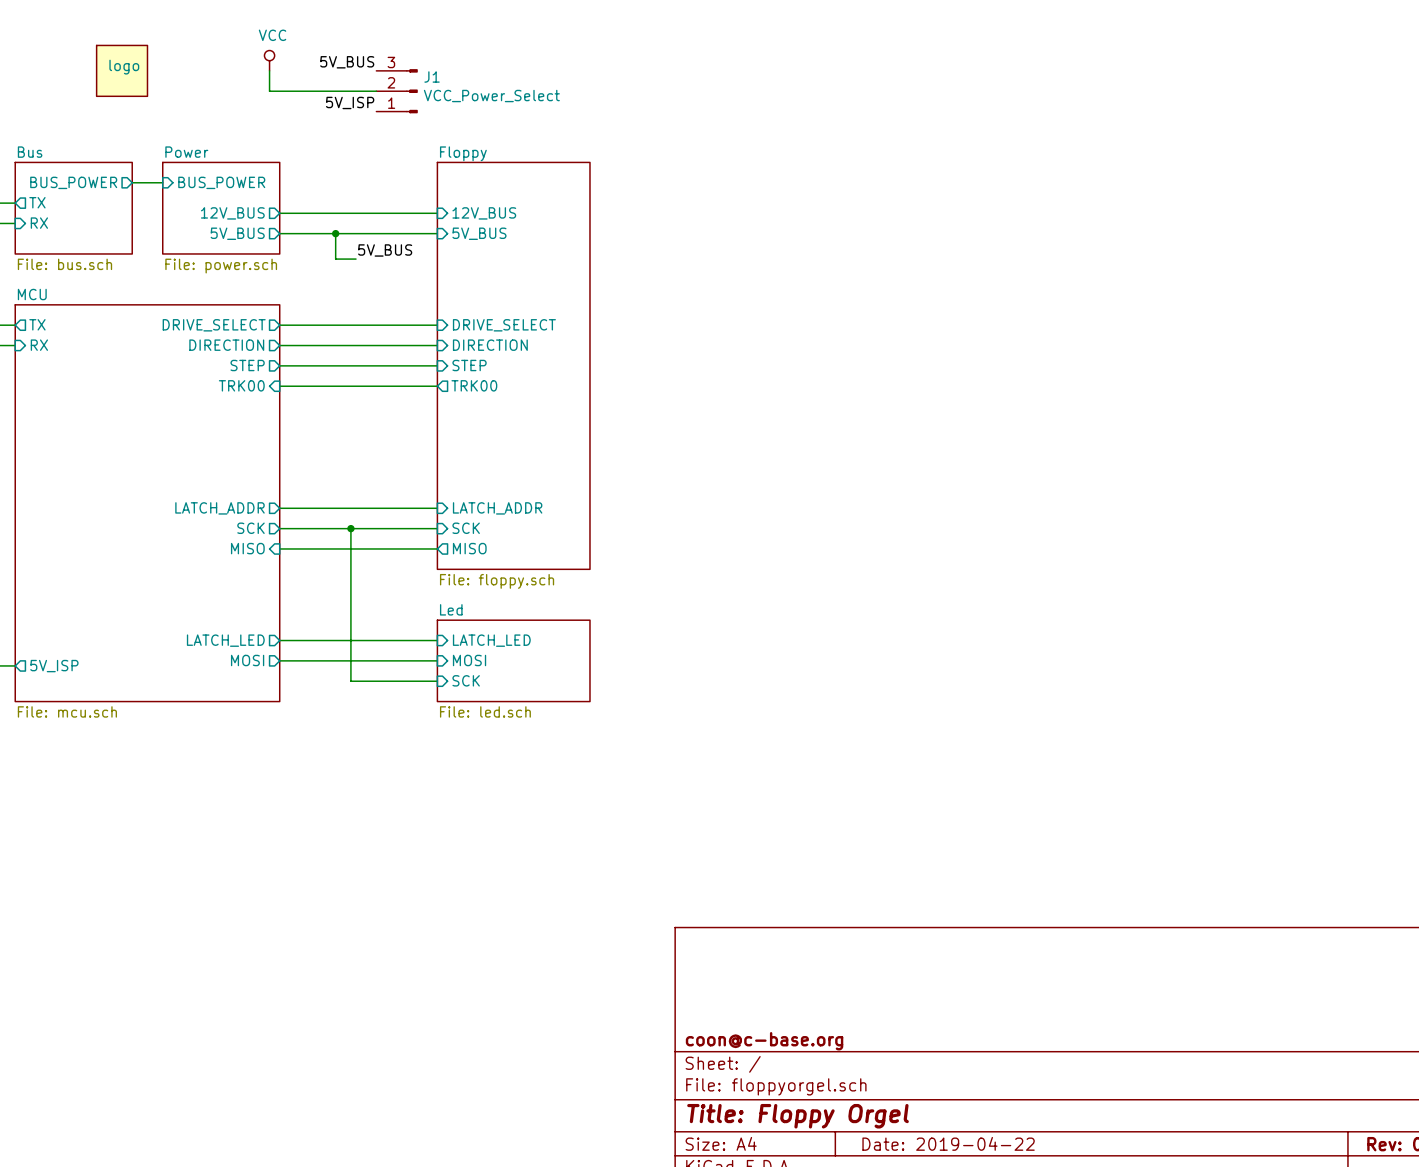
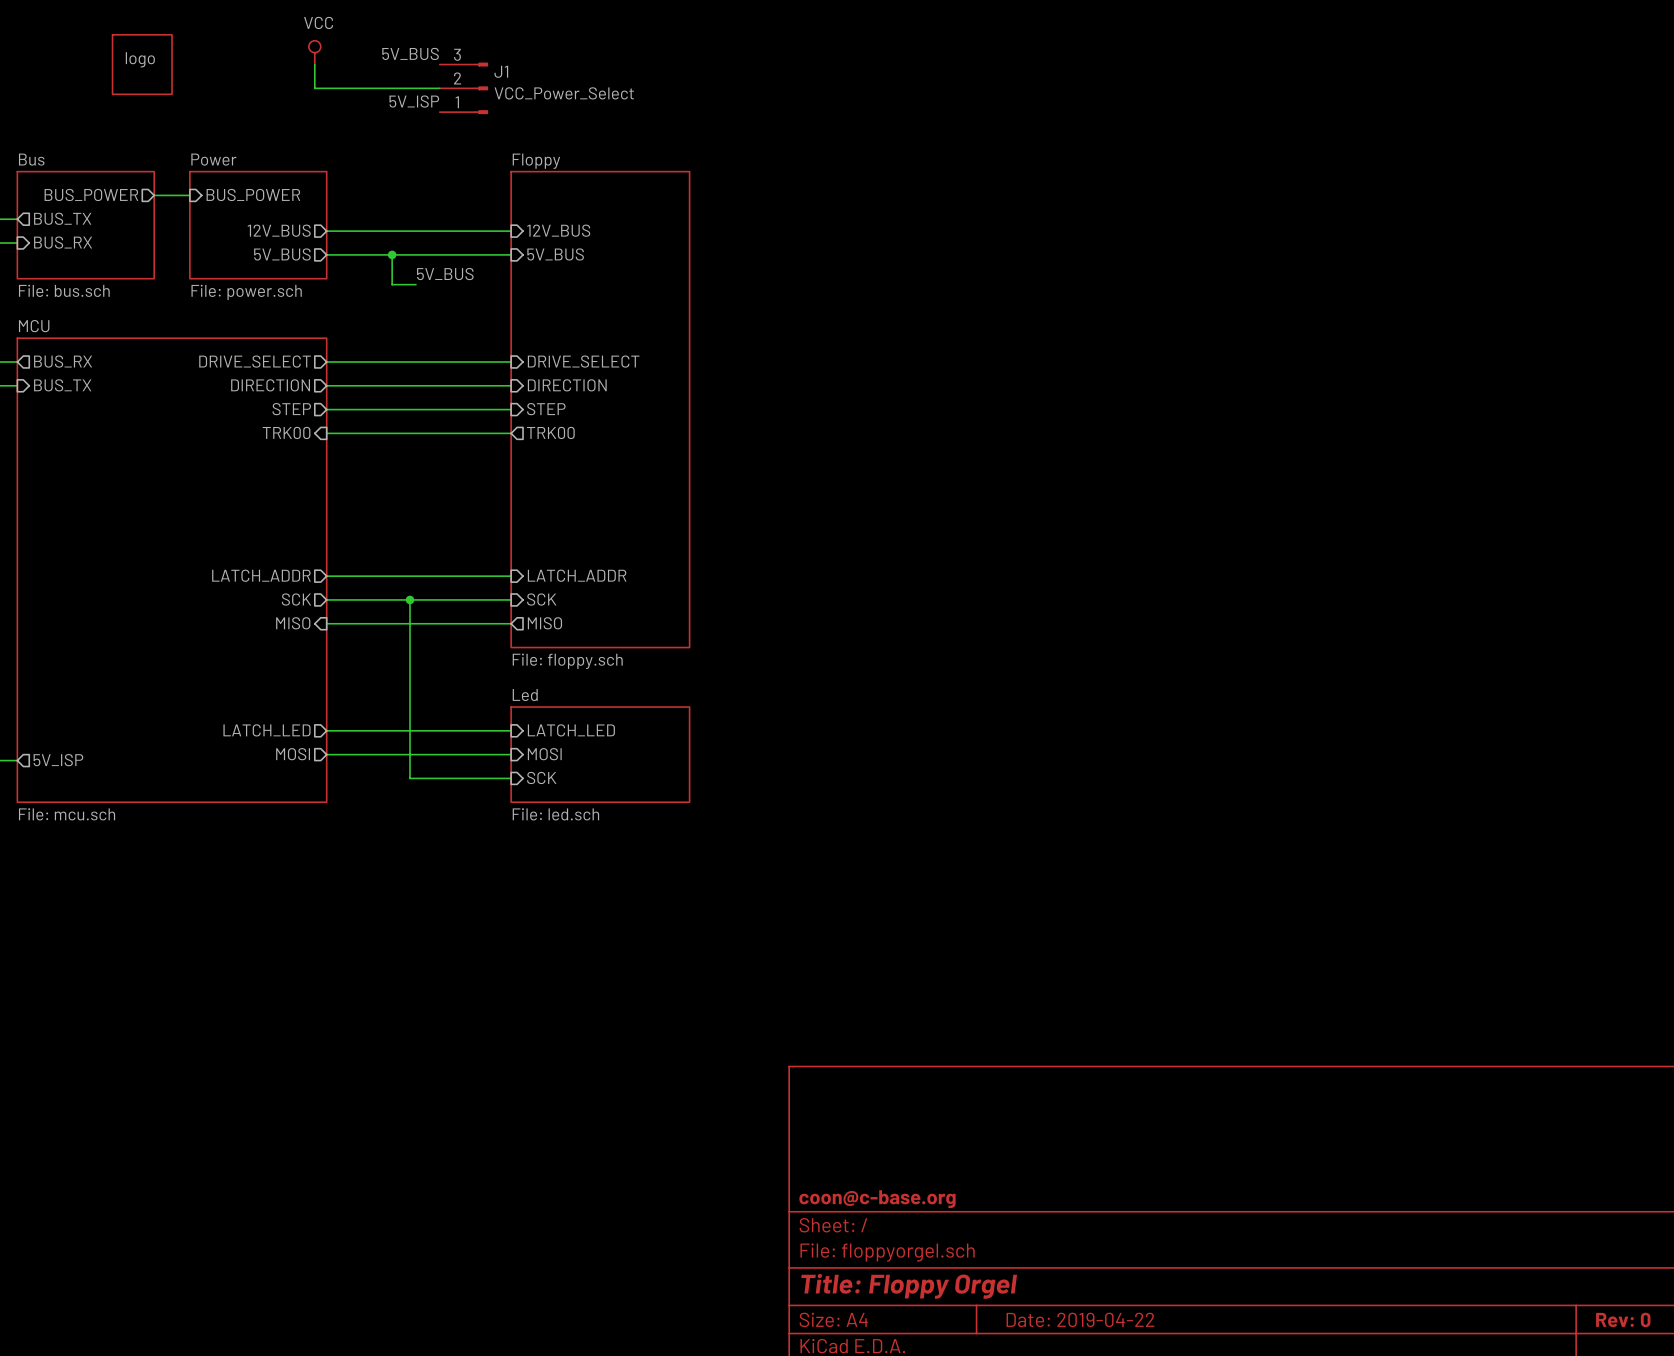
sheet pin: TX (37, 202) -> BUS_TX (62, 218)
sheet pin: RX (39, 223) -> BUS_RX (63, 242)
sheet pin: TX (37, 324) -> BUS_RX (63, 361)
sheet pin: RX (39, 345) -> BUS_TX (62, 385)

